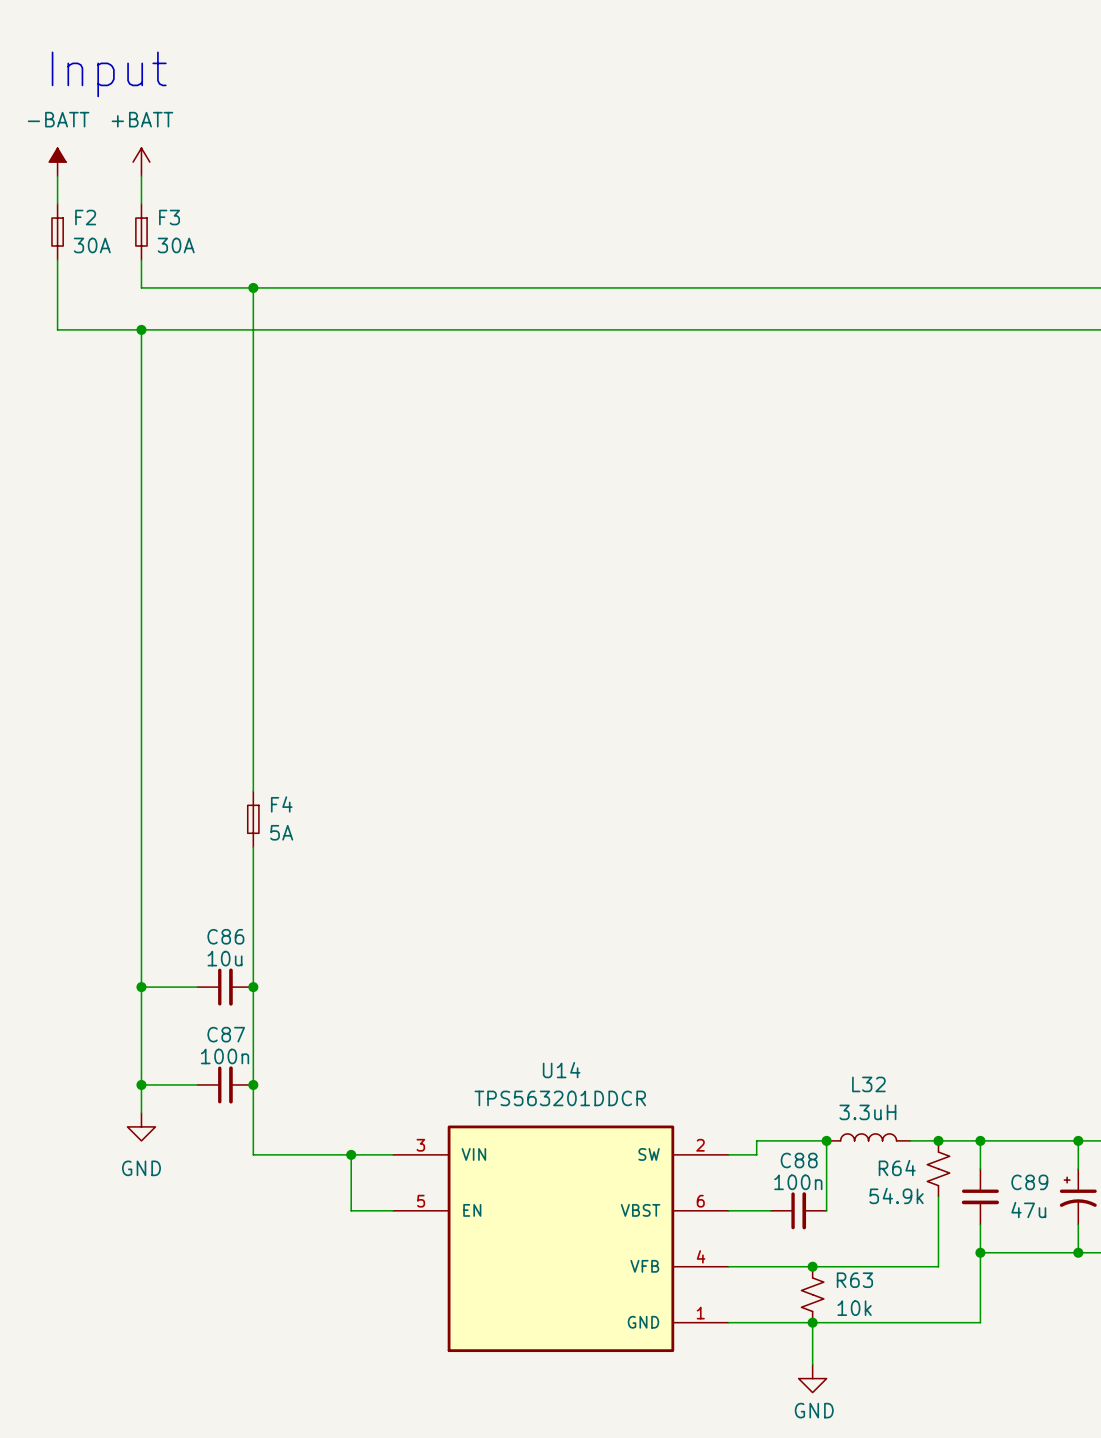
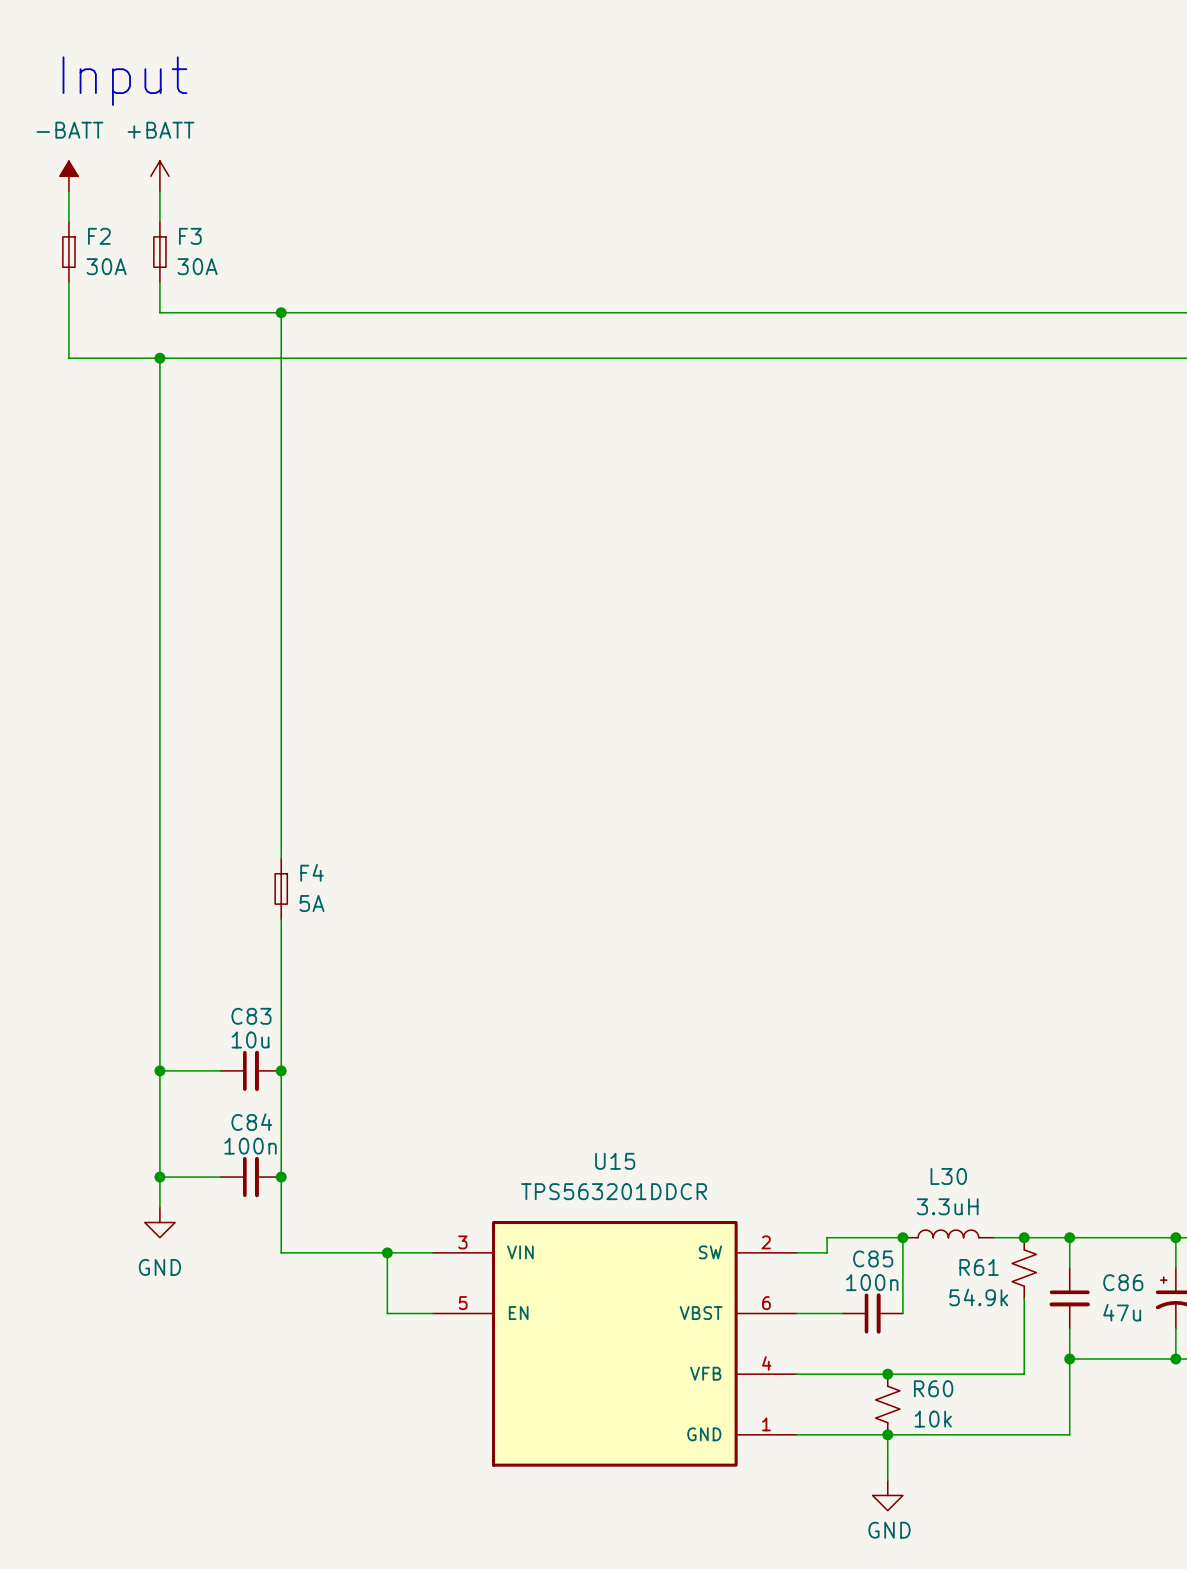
C86 name: C86 (225, 936) -> C83 (251, 1016)
C87 name: C87 (226, 1034) -> C84 (251, 1122)
U14 name: U14 (561, 1070) -> U15 (615, 1161)
L32 name: L32 (868, 1084) -> L30 (948, 1176)
C88 name: C88 (799, 1160) -> C85 (873, 1258)
R64 name: R64 (897, 1168) -> R61 (979, 1267)
C89 name: C89 (1029, 1182) -> C86 (1123, 1282)
R63 name: R63 (854, 1280) -> R60 (933, 1388)

